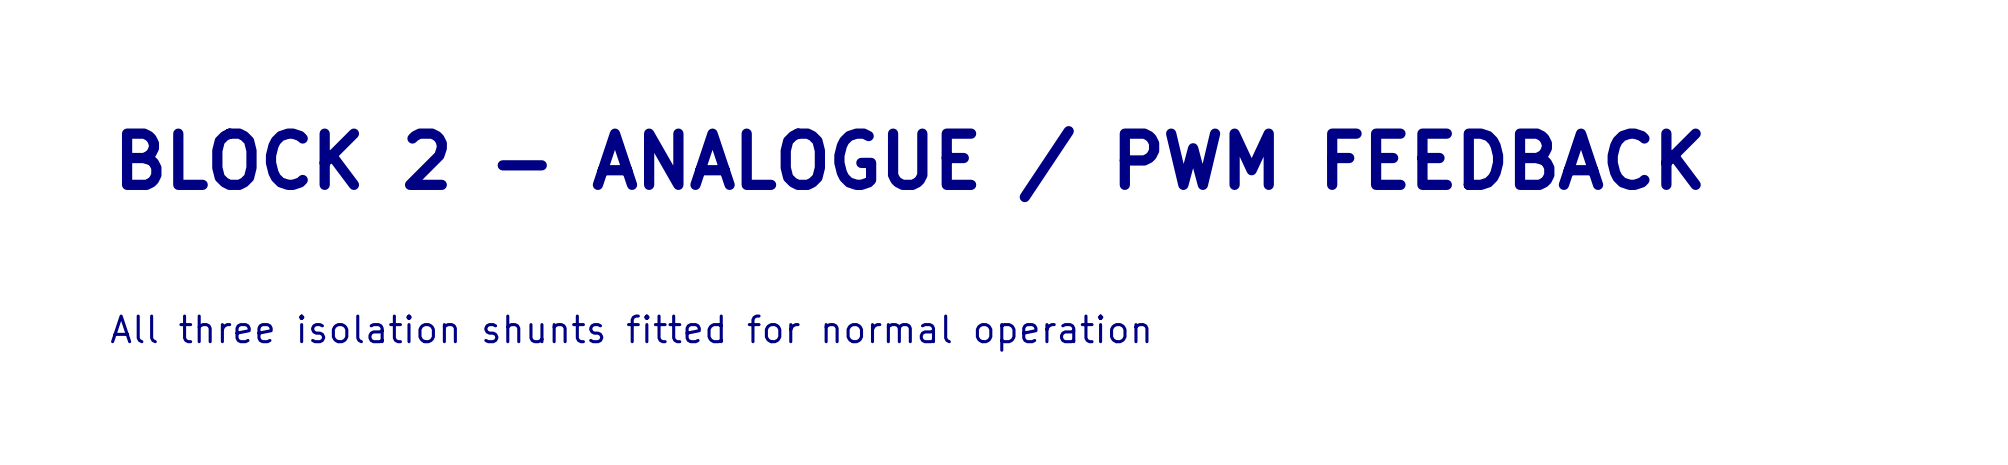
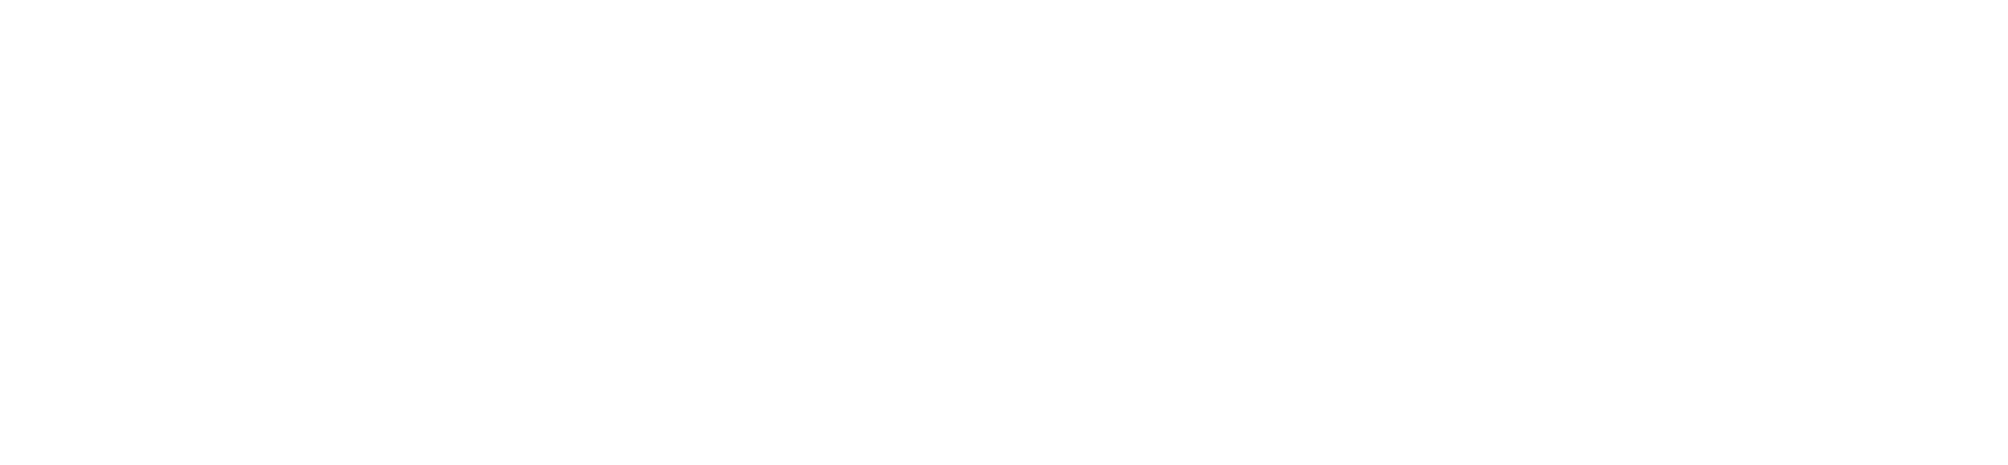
text: BLOCK 2 - ANALOGUE / PWM FEEDBACK (911, 164) -> none
text: All three isolation shunts fitted for normal operation (629, 333) -> none

